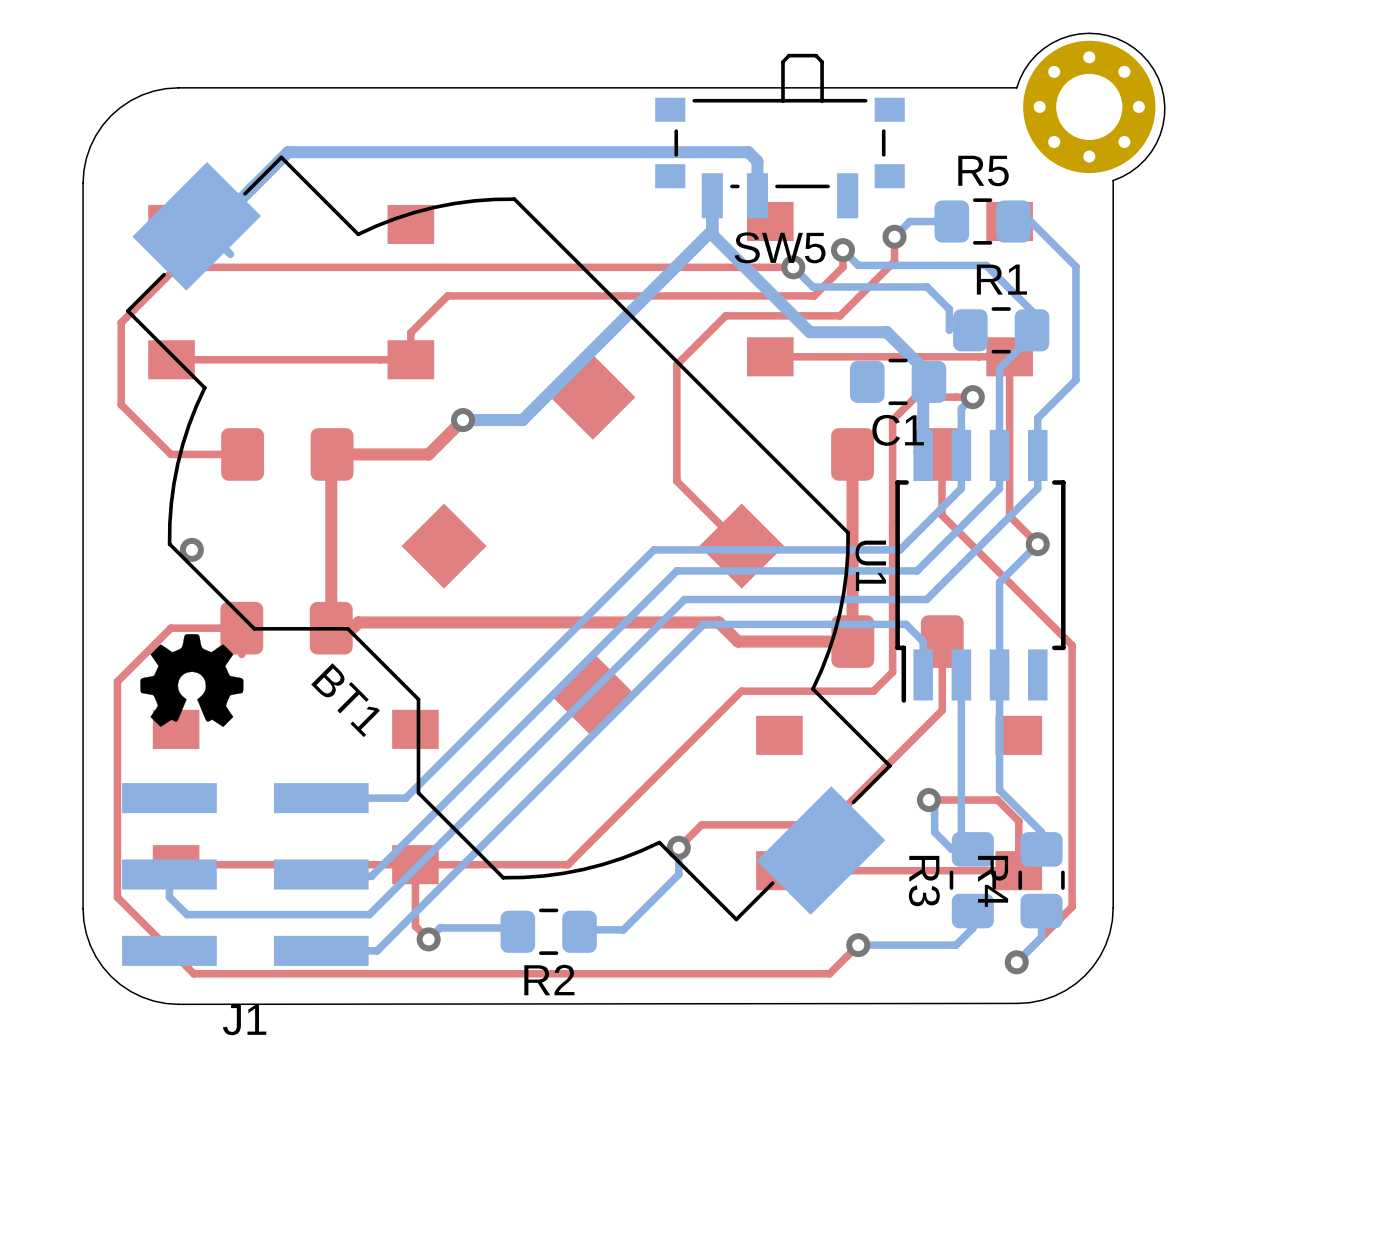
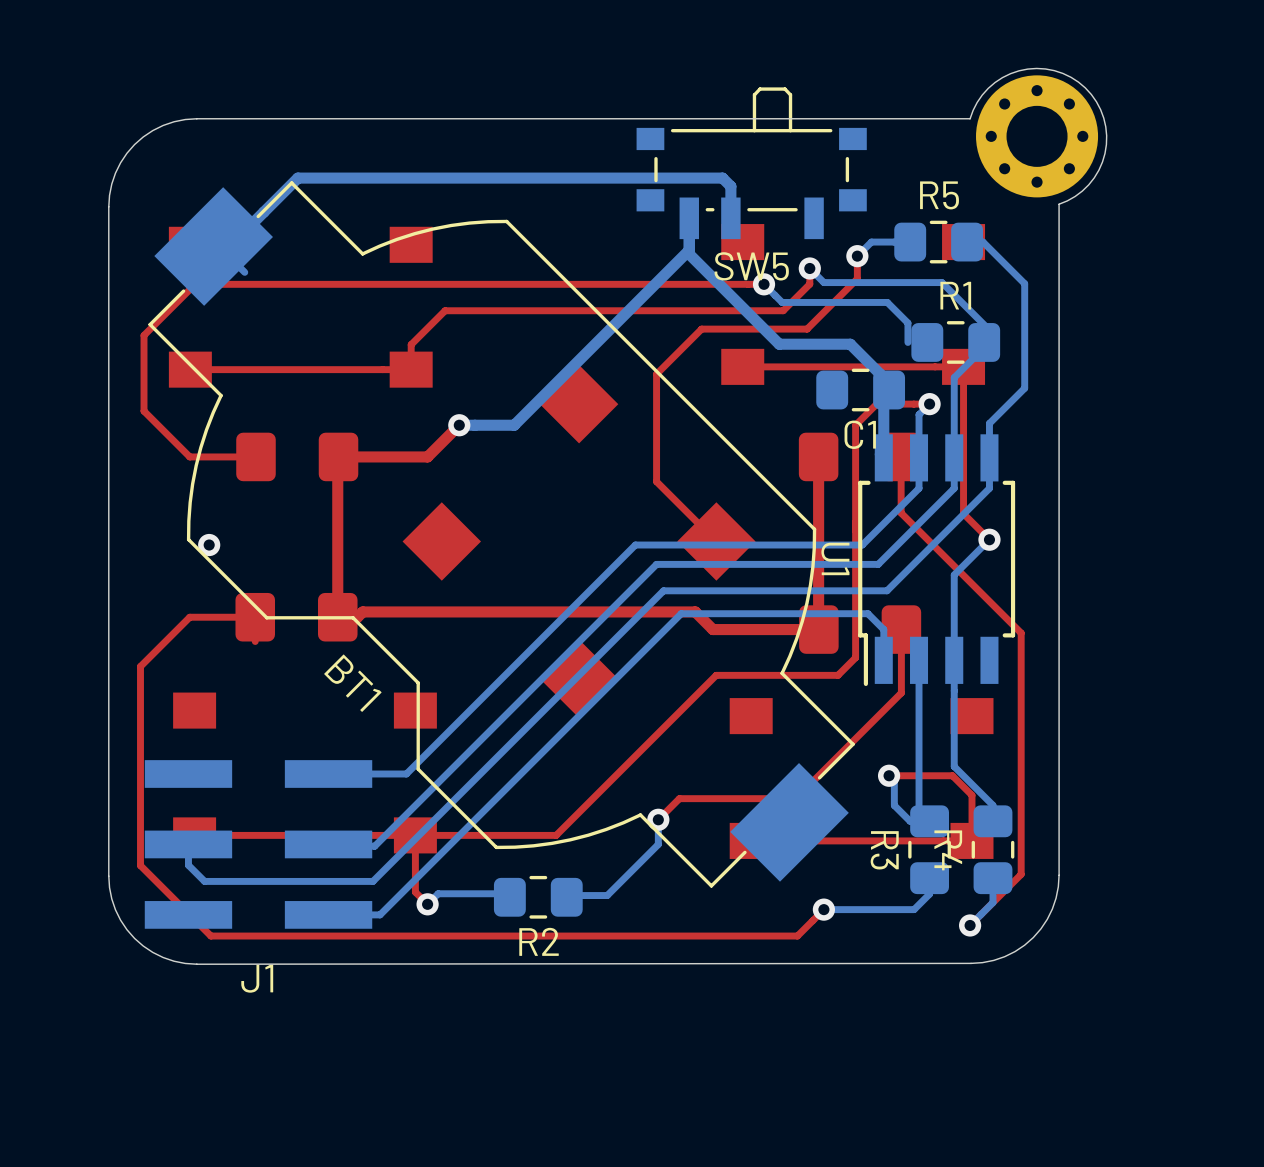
drawing: [140, 634, 244, 728] -> none

